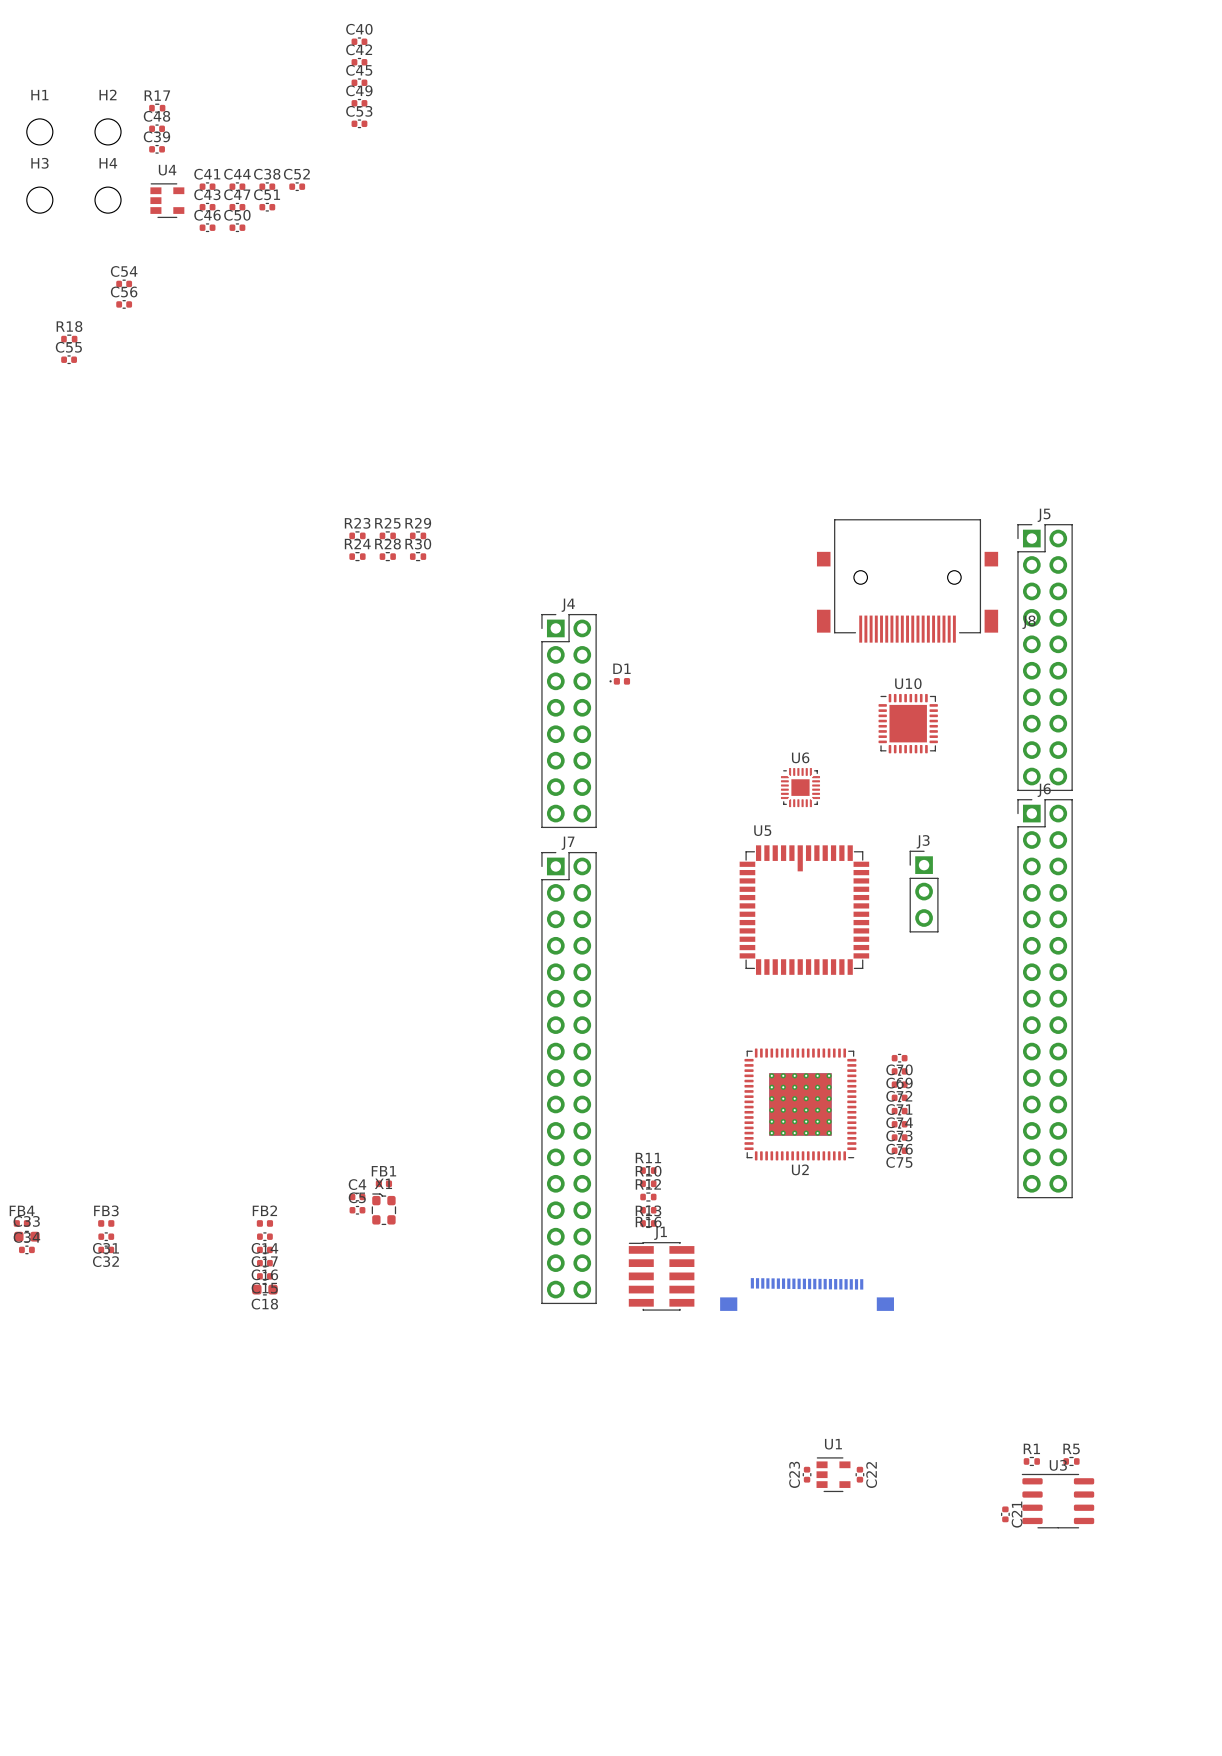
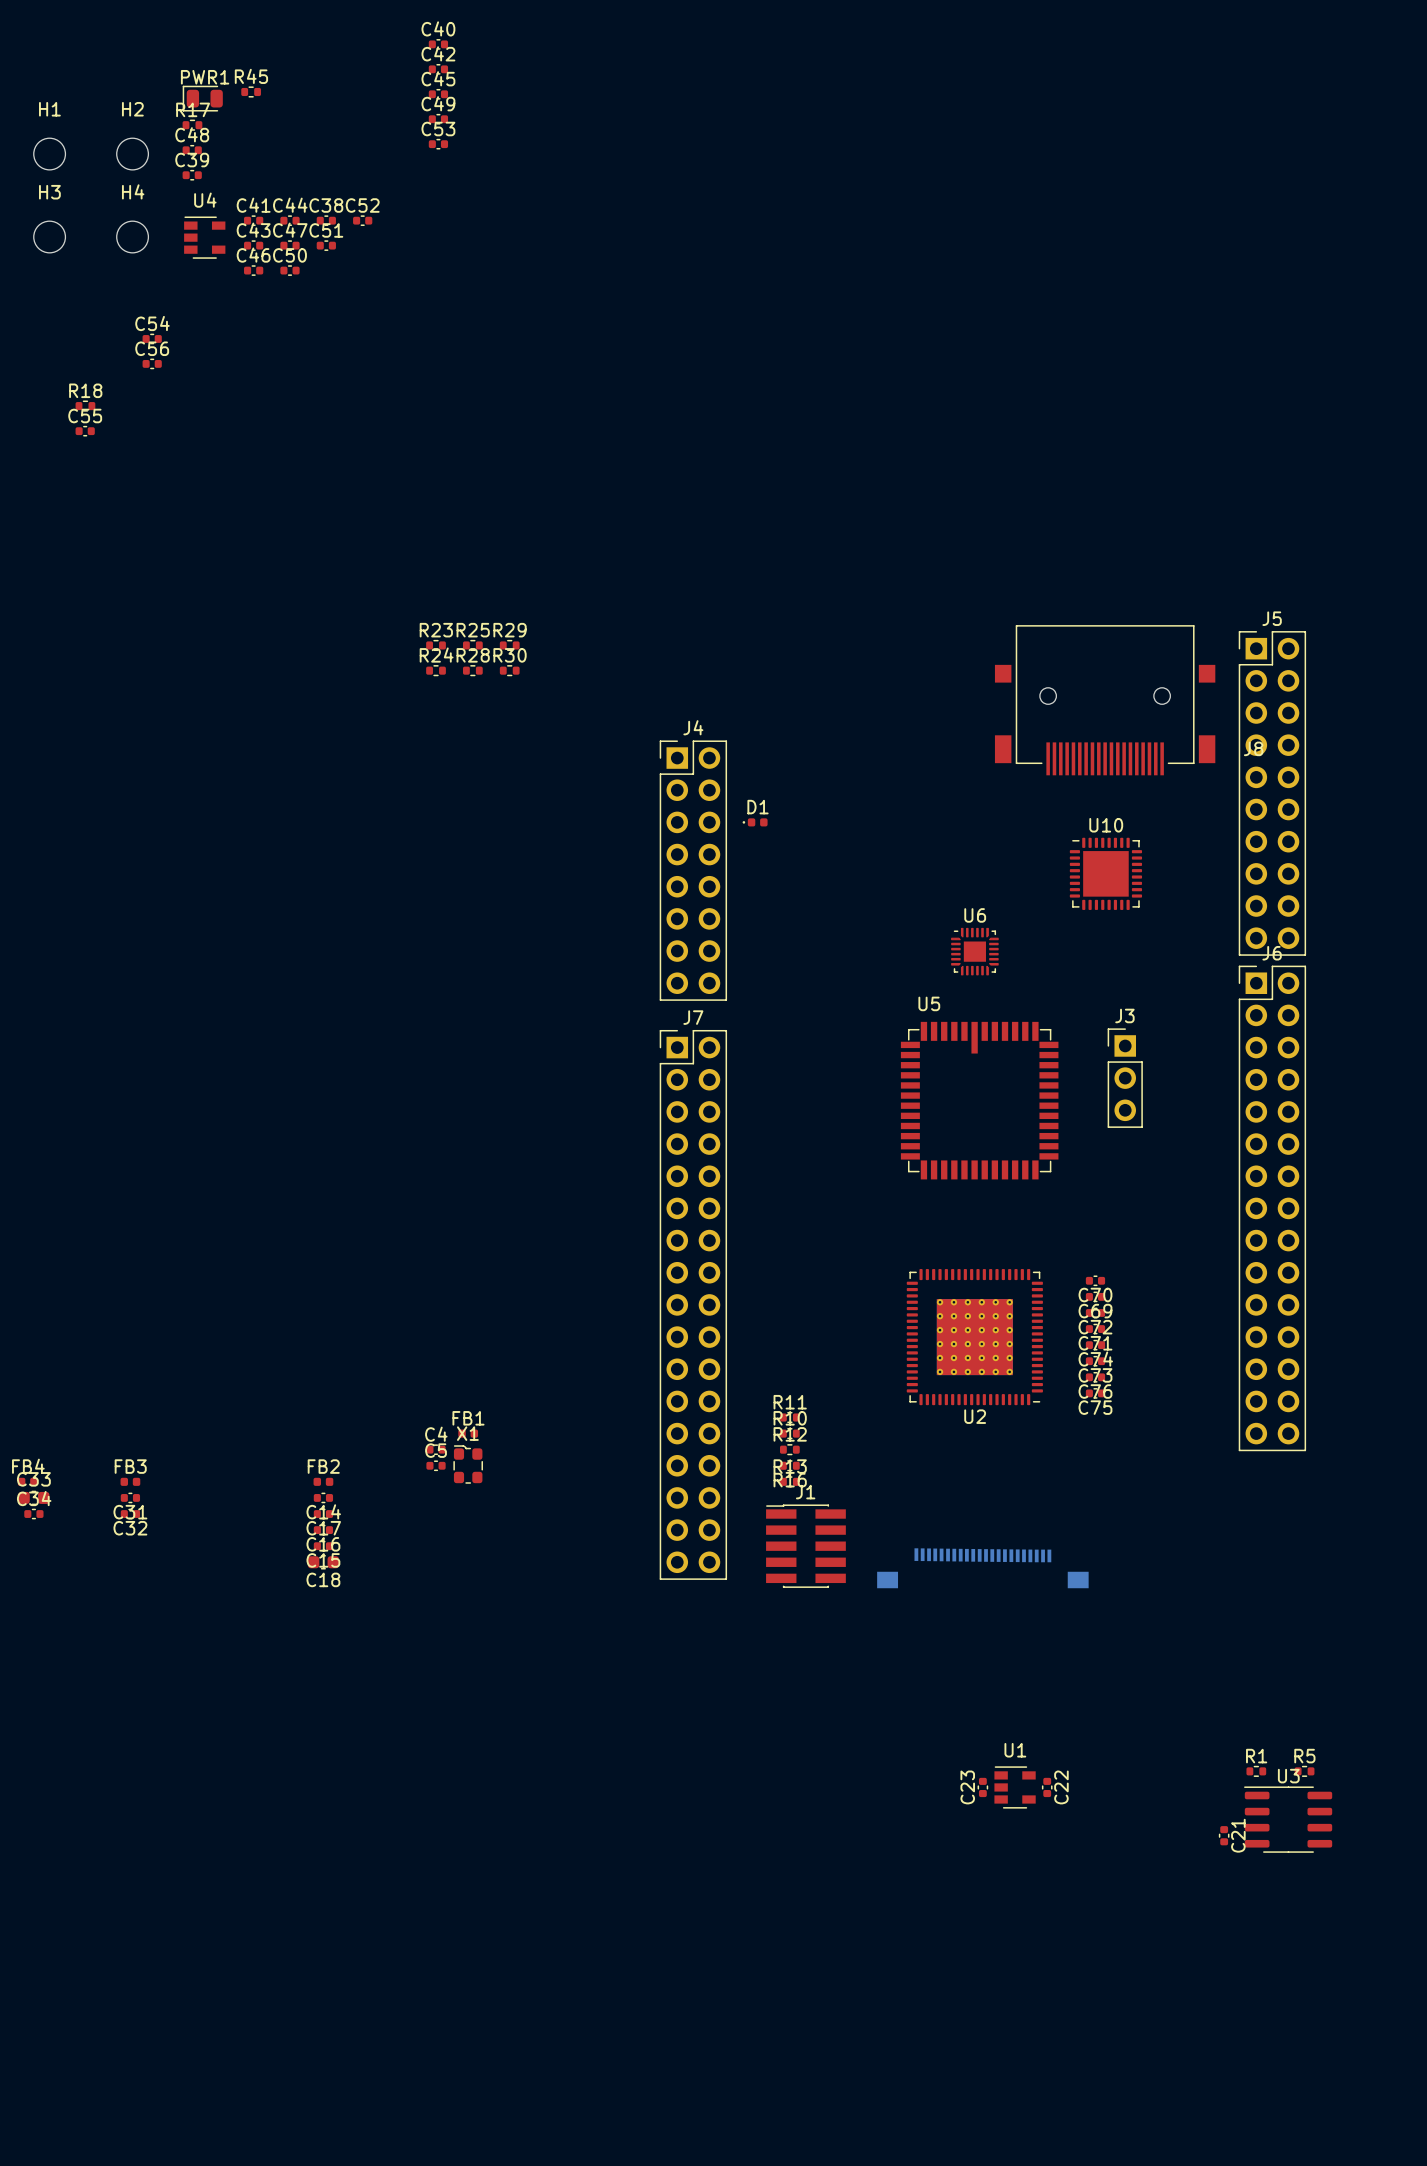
R45: none -> (251, 91)
PWR1: none -> (202, 98)

